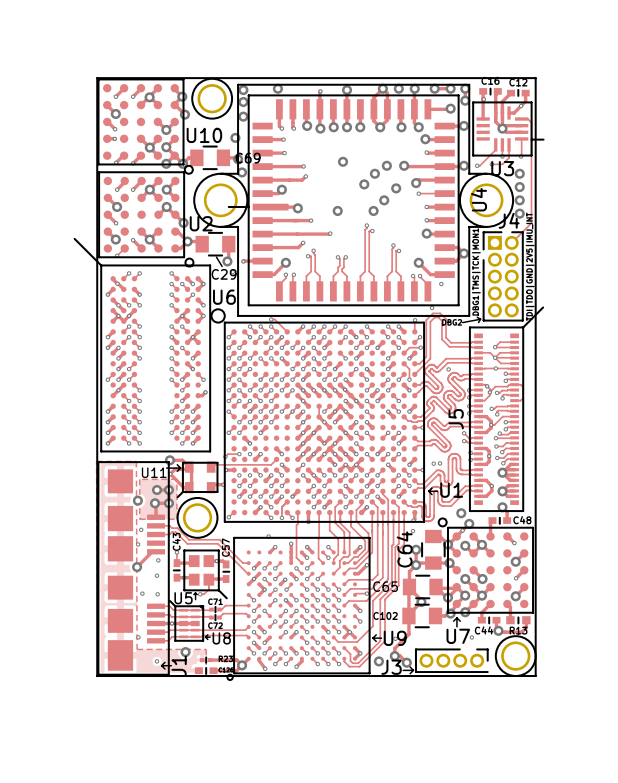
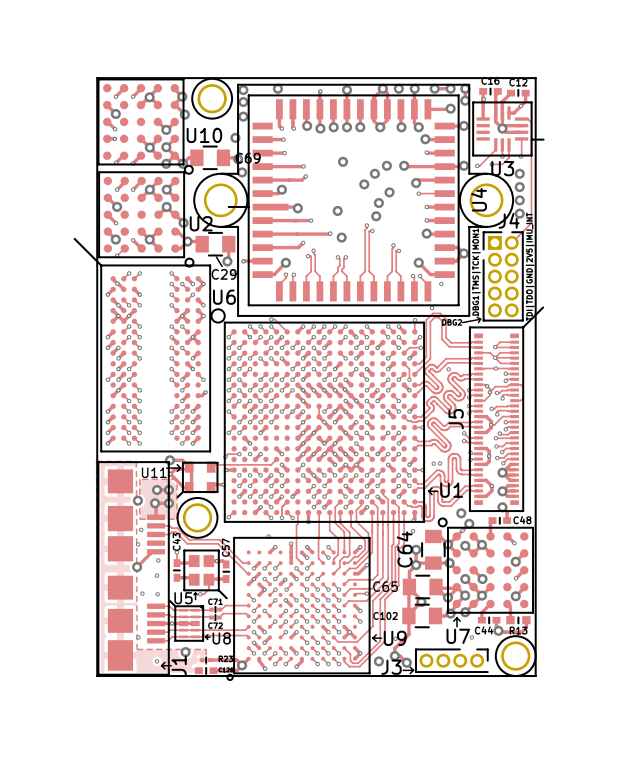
via: (396, 188) -> none
via: none -> (389, 192)
via: (384, 200) -> none
via: none -> (378, 203)
via: (373, 210) -> none
via: none -> (376, 216)
via: none -> (341, 237)

